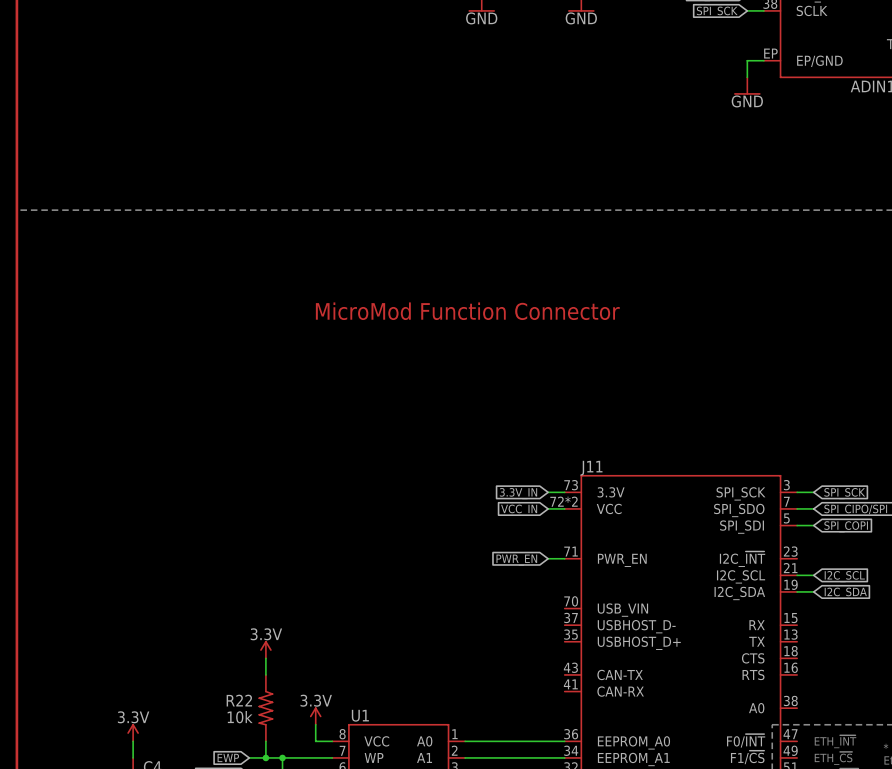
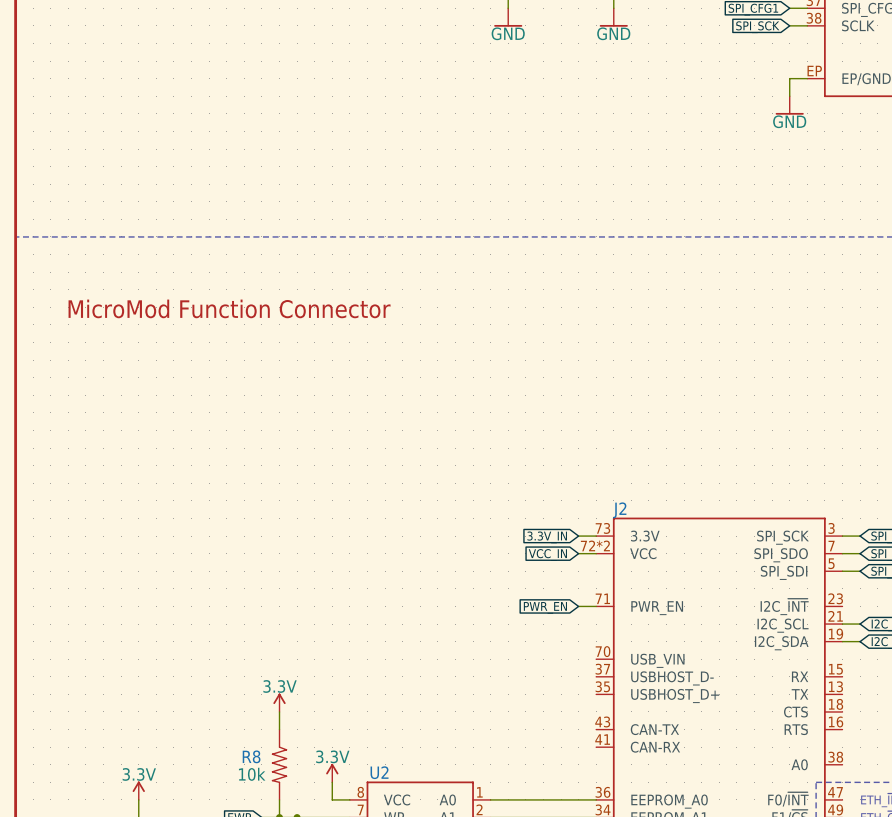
text: none -> MicroMod Function Connector (229, 308)
text: MicroMod Function Connector (467, 311) -> none
J11 name: J11 (591, 468) -> J2 (619, 510)
R22 name: R22 (239, 700) -> R8 (251, 756)
U1 name: U1 (360, 715) -> U2 (379, 772)

